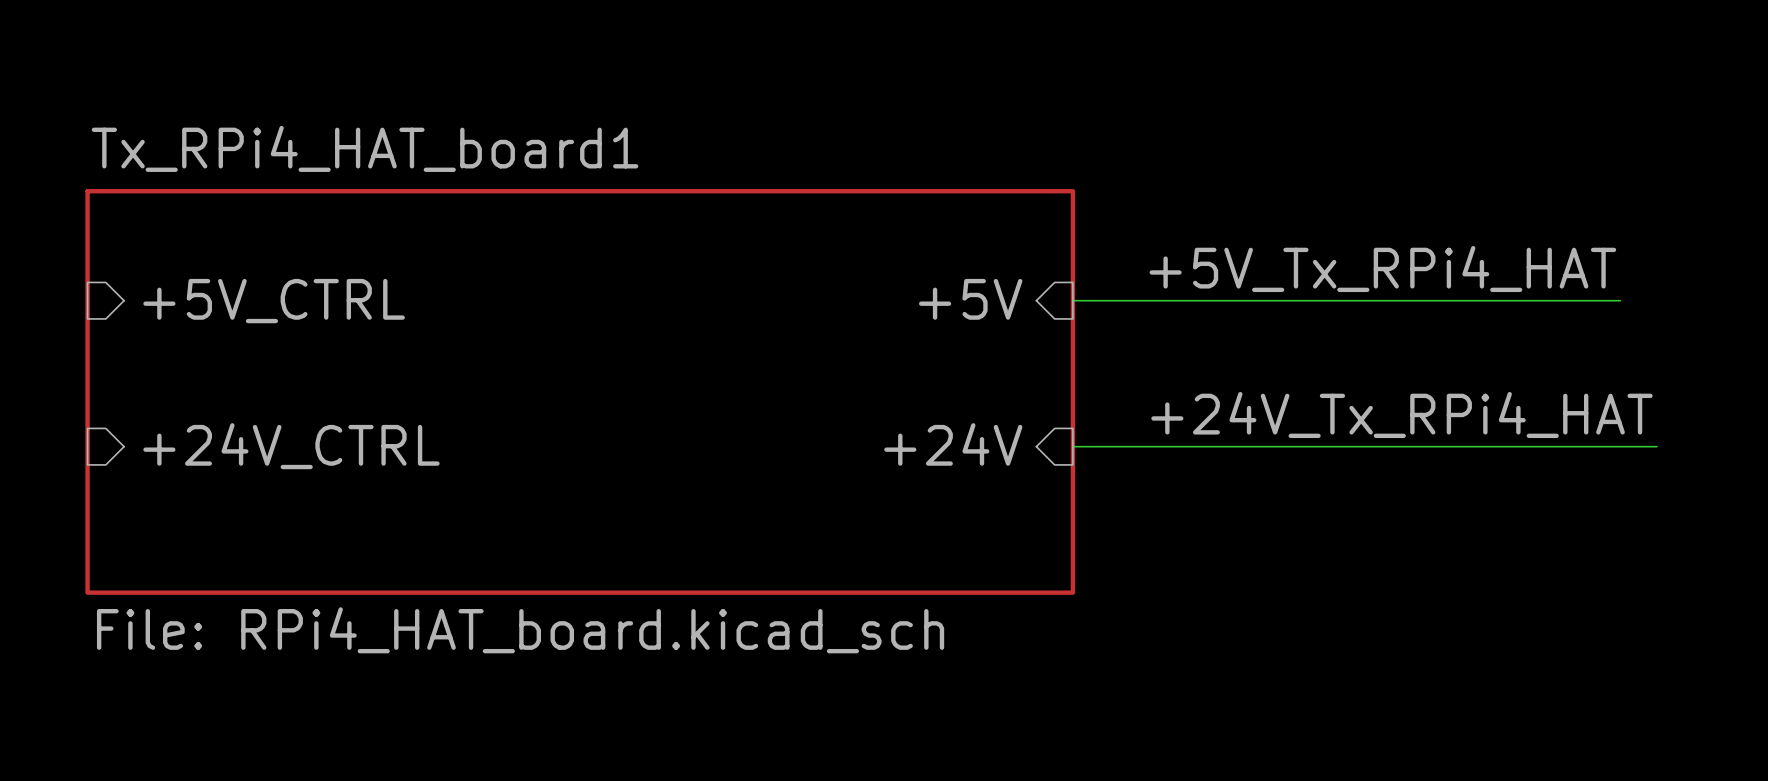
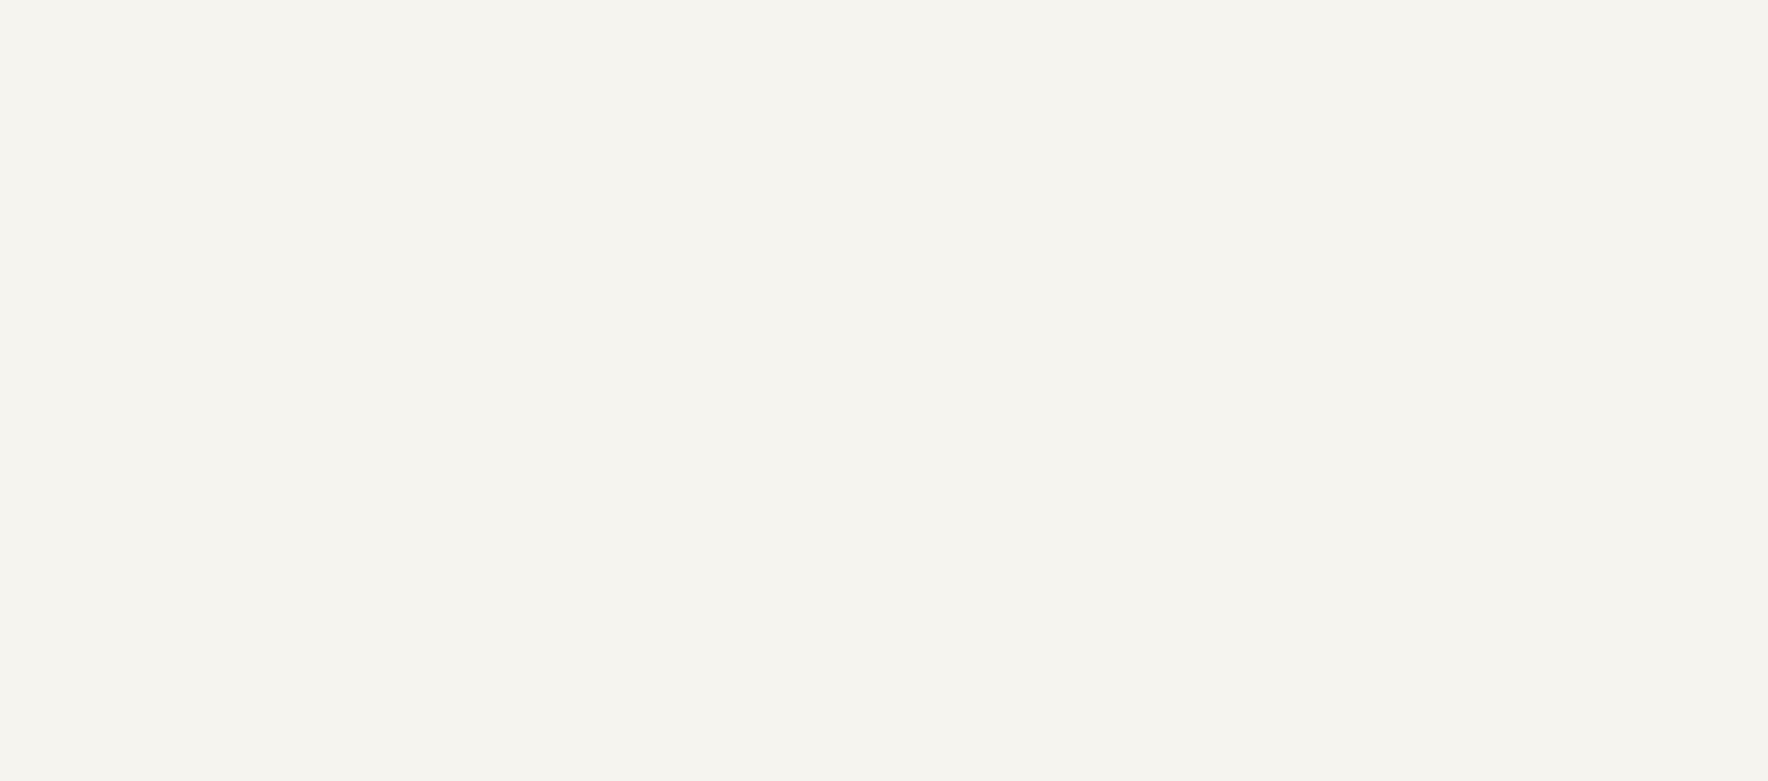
label: +5V_Tx_RPi4_HAT (1382, 269) -> none
sheet pin: +5V (970, 299) -> none
wire: (1072, 300) (1620, 300) -> none
sheet pin: +5V_CTRL (274, 301) -> none
sheet Tx_RPi4_HAT_board1: File: RPi4_HAT_board.kicad_sch (580, 391) -> none
label: +24V_Tx_RPi4_HAT (1401, 414) -> none
sheet pin: +24V (953, 444) -> none
sheet pin: +24V_CTRL (291, 446) -> none
wire: (1072, 446) (1656, 446) -> none

